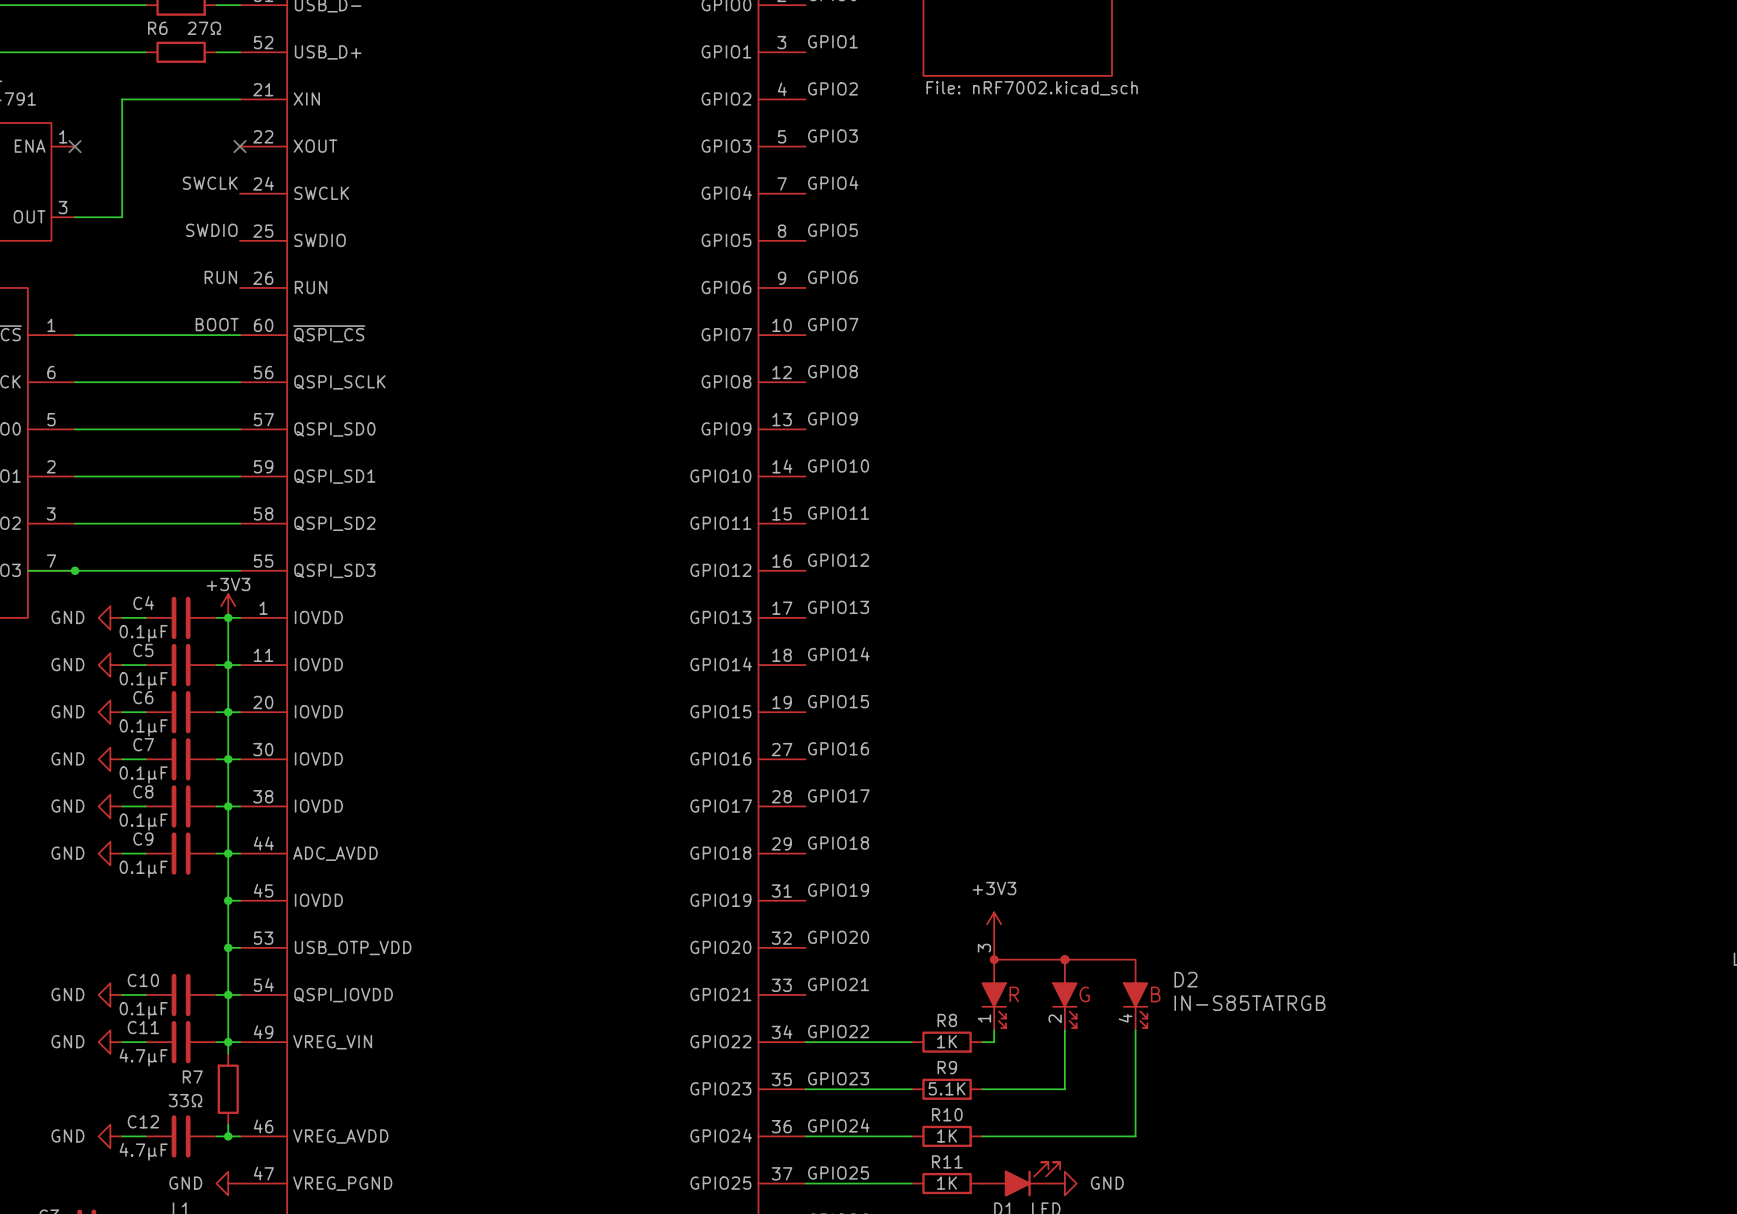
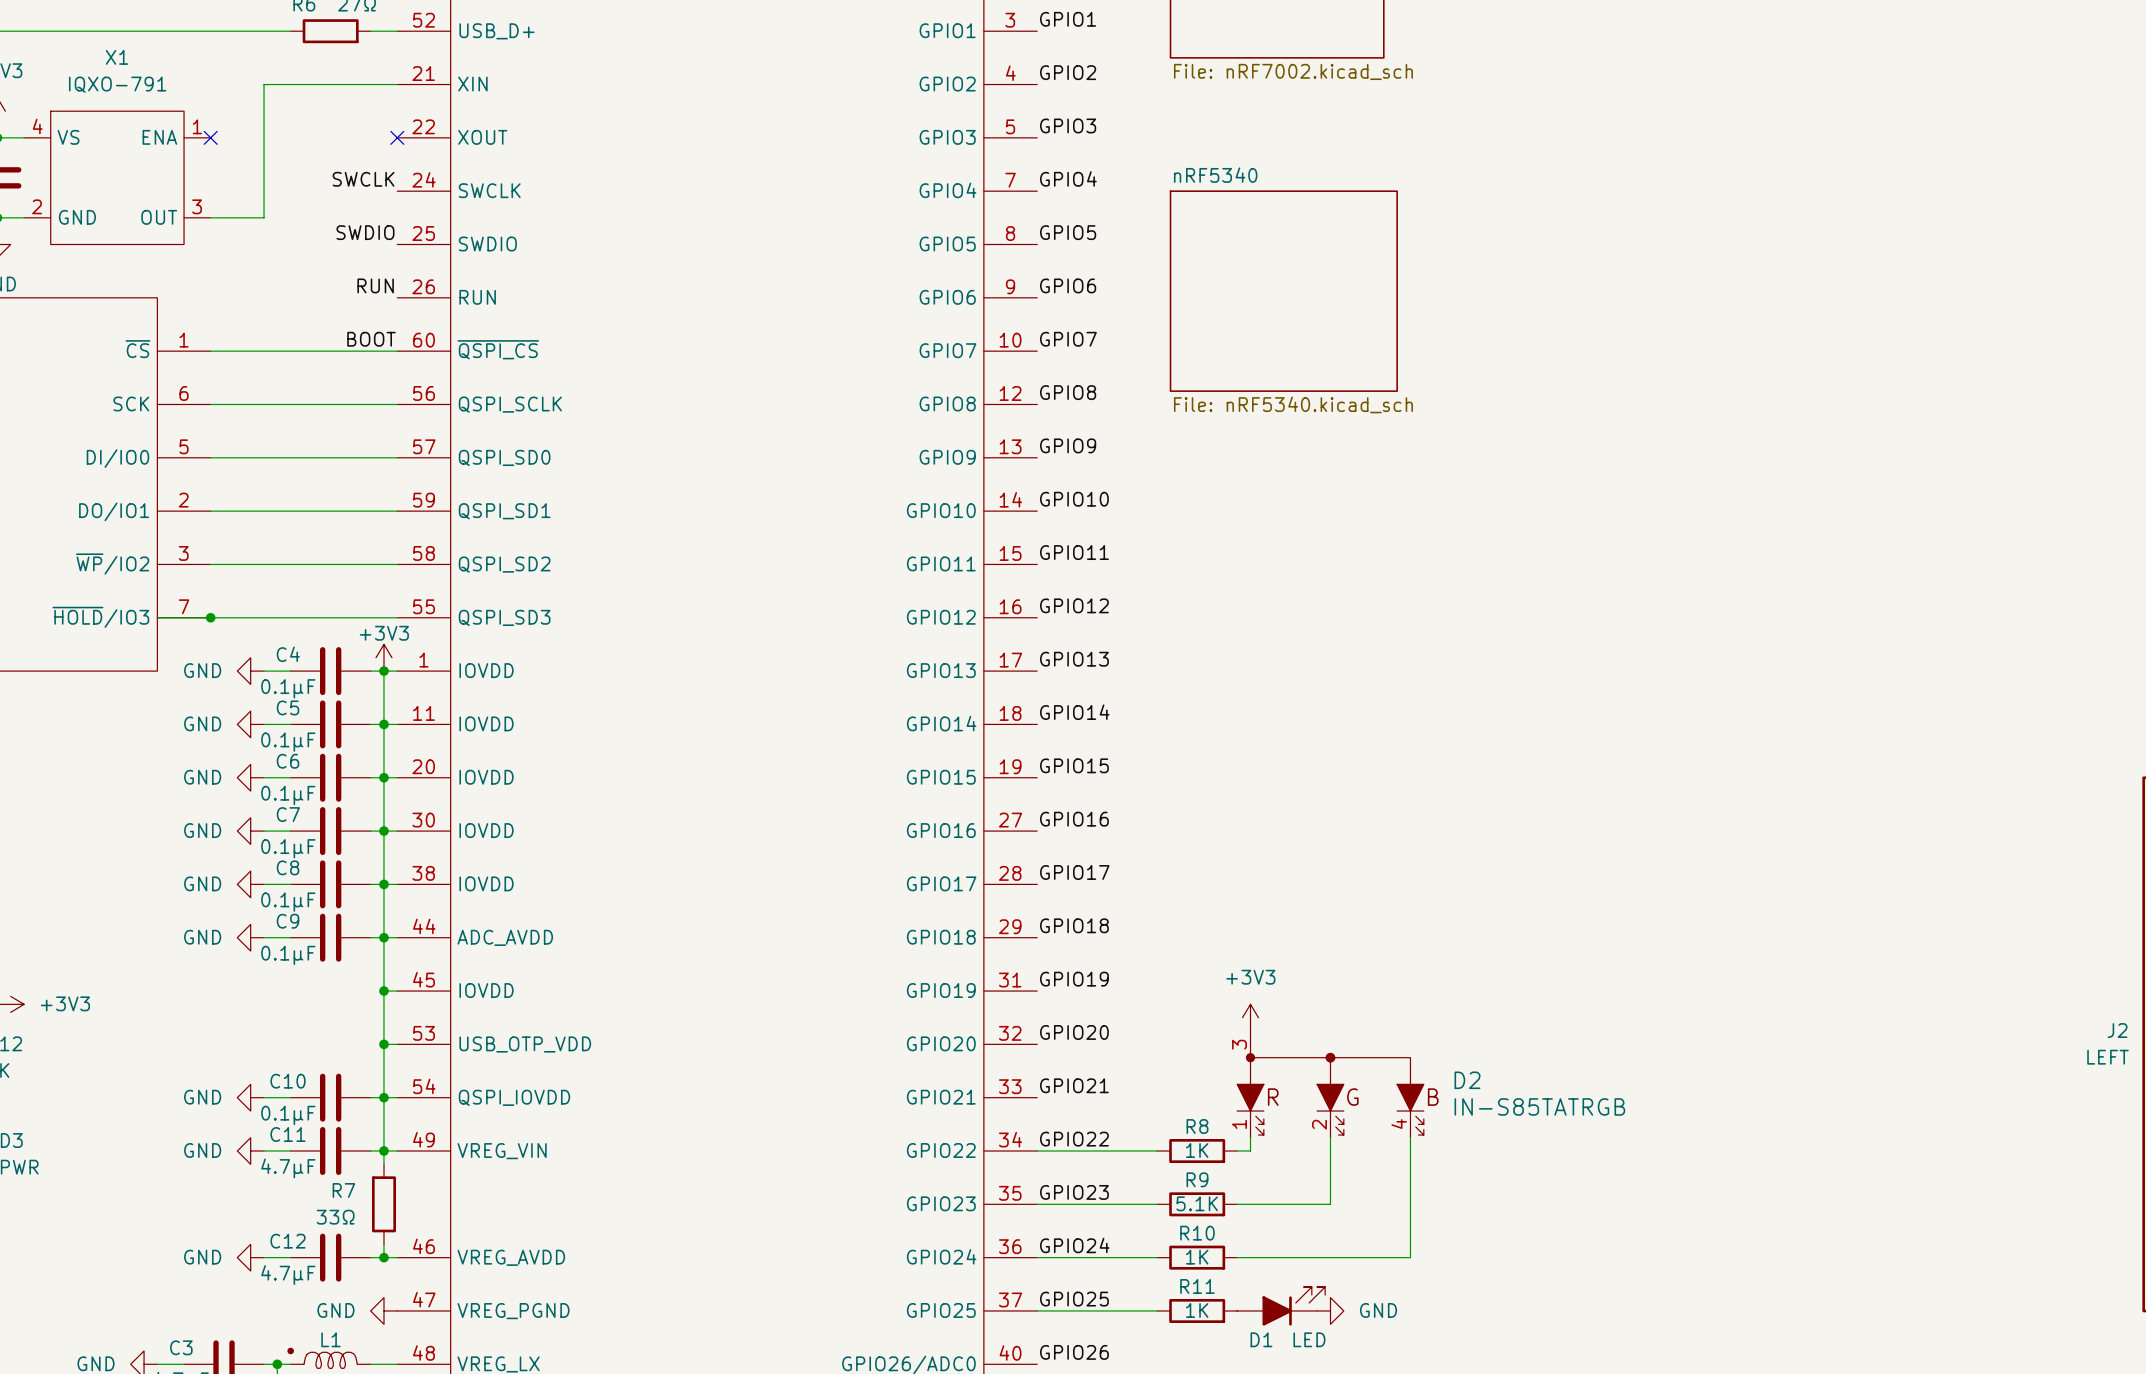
sheet nRF5340: none -> File: nRF5340.kicad_sch (1283, 291)

